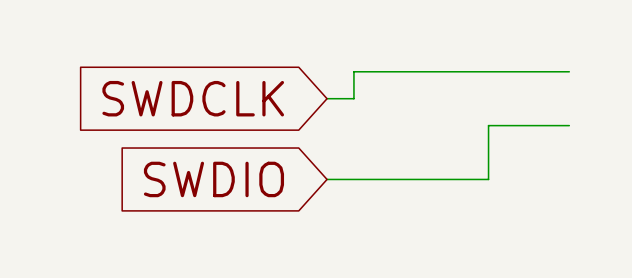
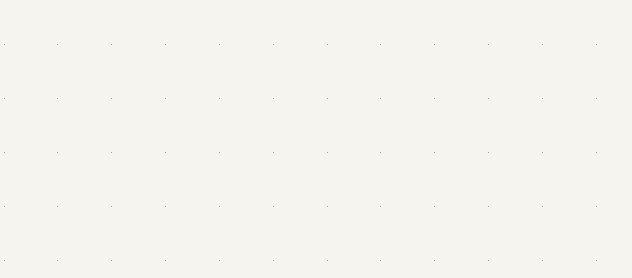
wire: (569, 71) (353, 71) (353, 98) (327, 98) -> none
global label: SWDCLK (193, 98) -> none
wire: (569, 125) (488, 125) (488, 179) (327, 179) -> none
global label: SWDIO (213, 179) -> none

